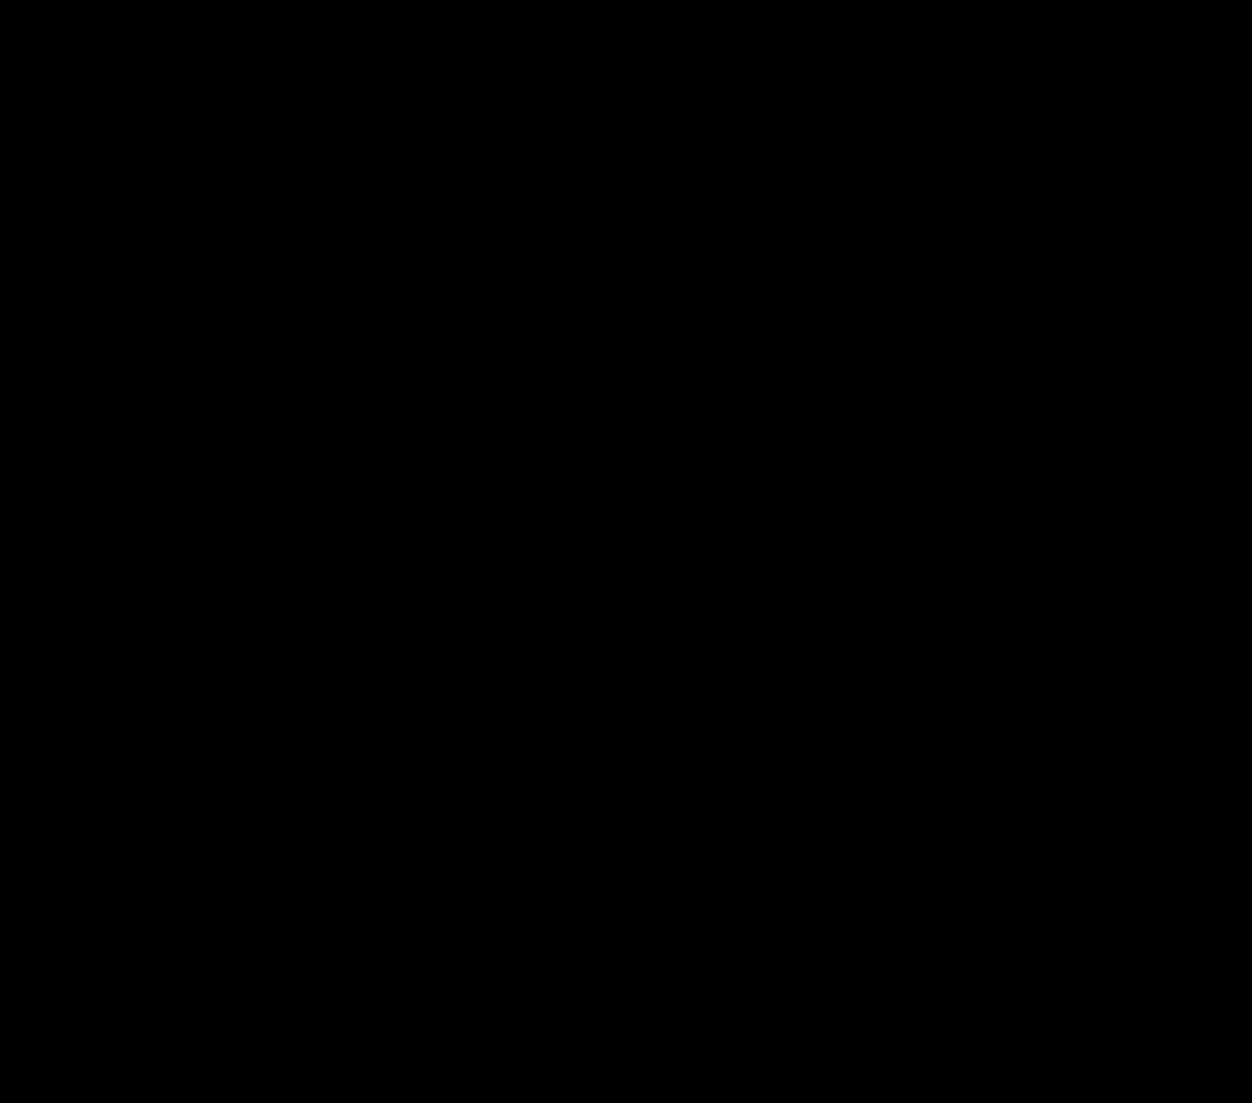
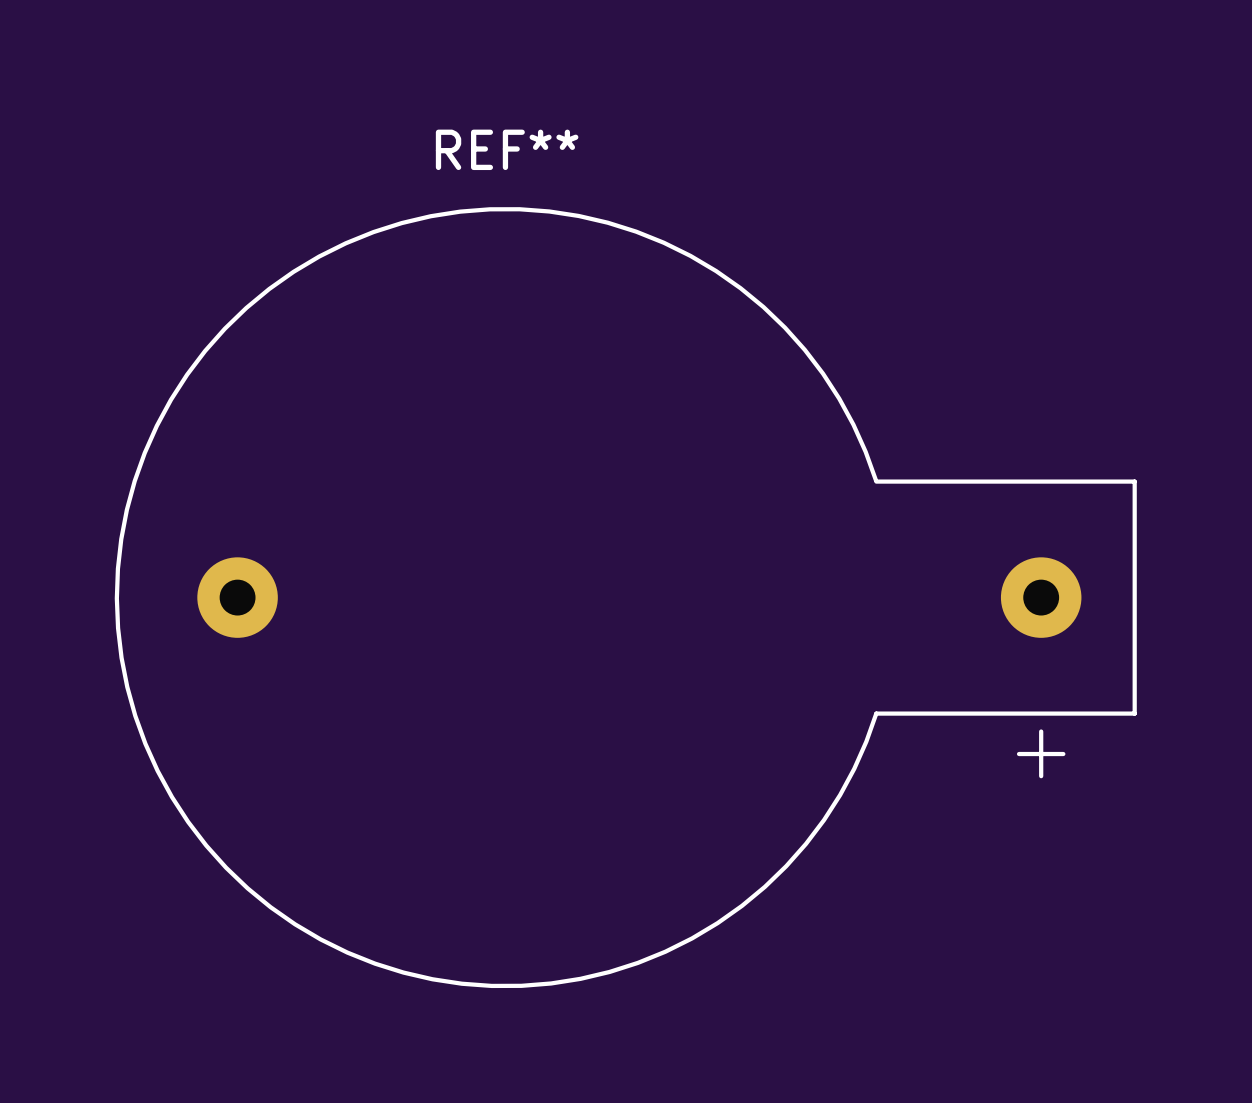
REF**: none -> (625, 597)

